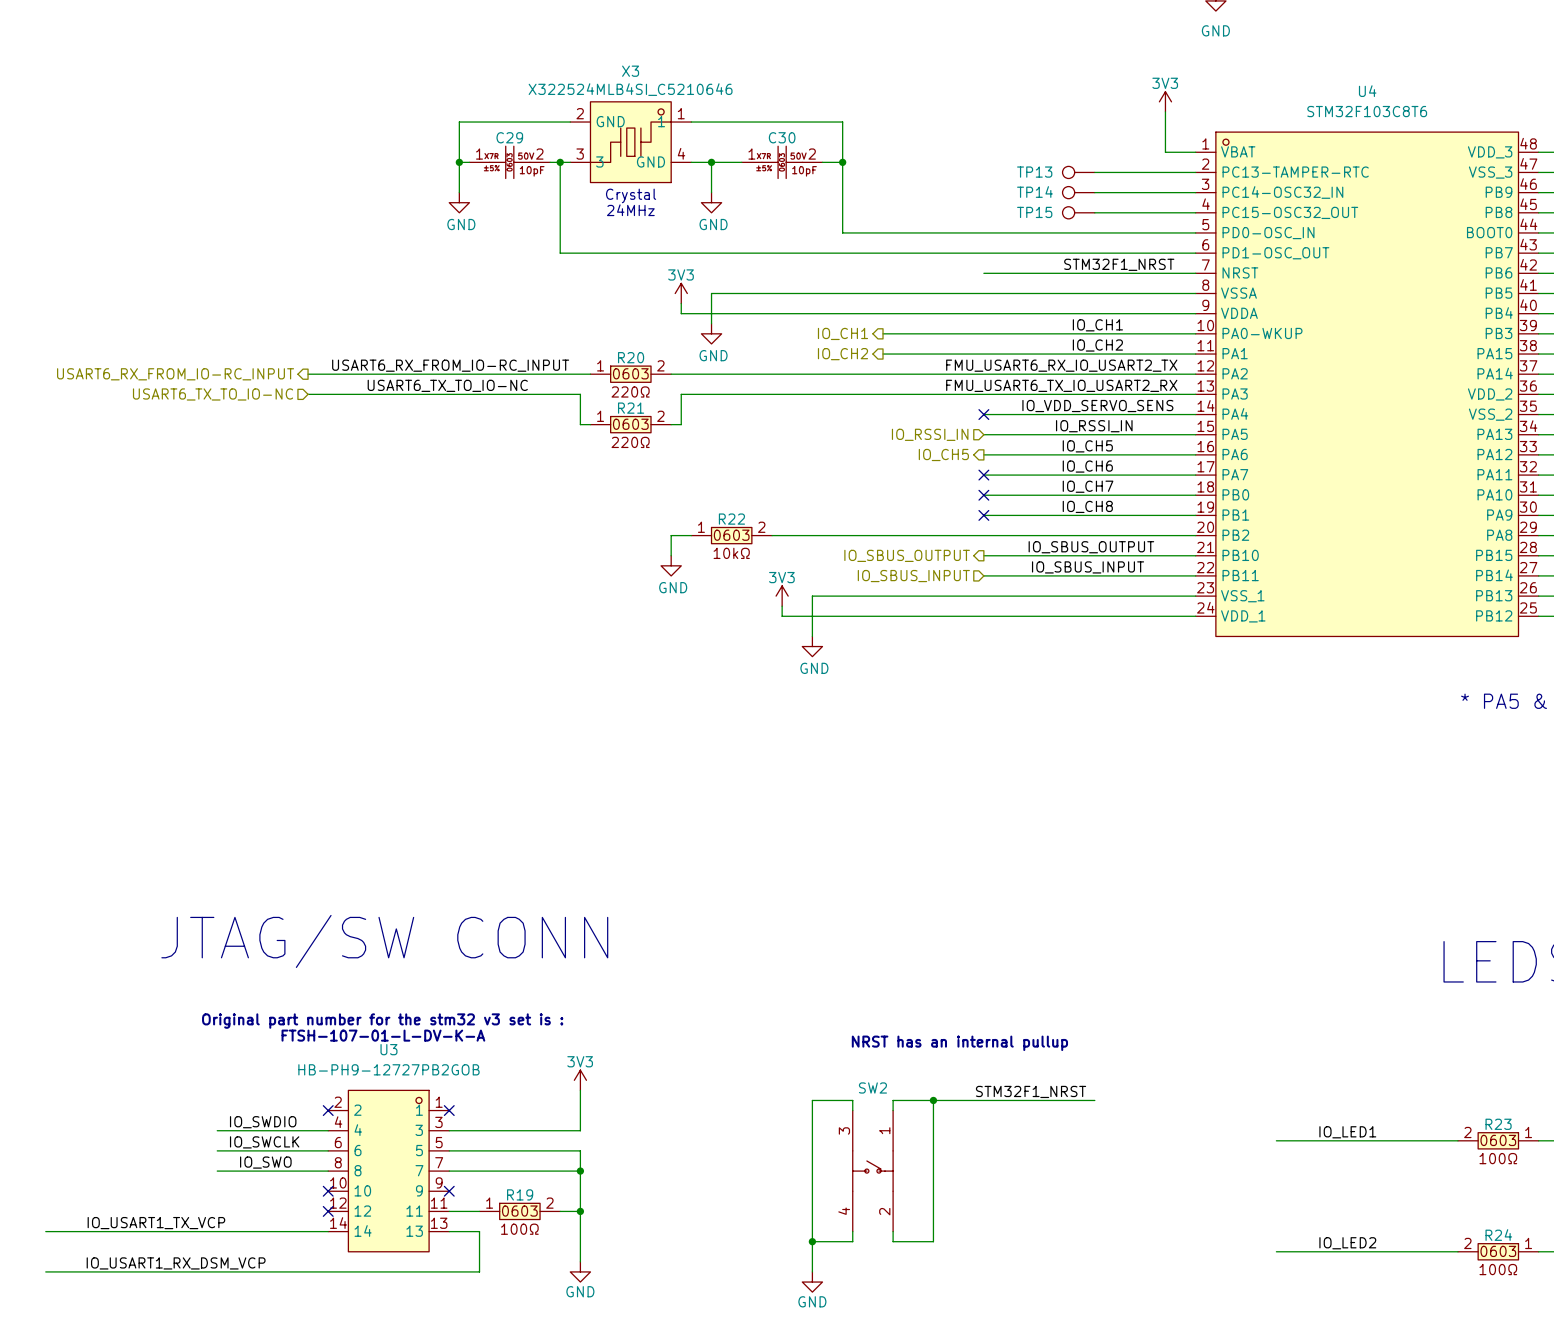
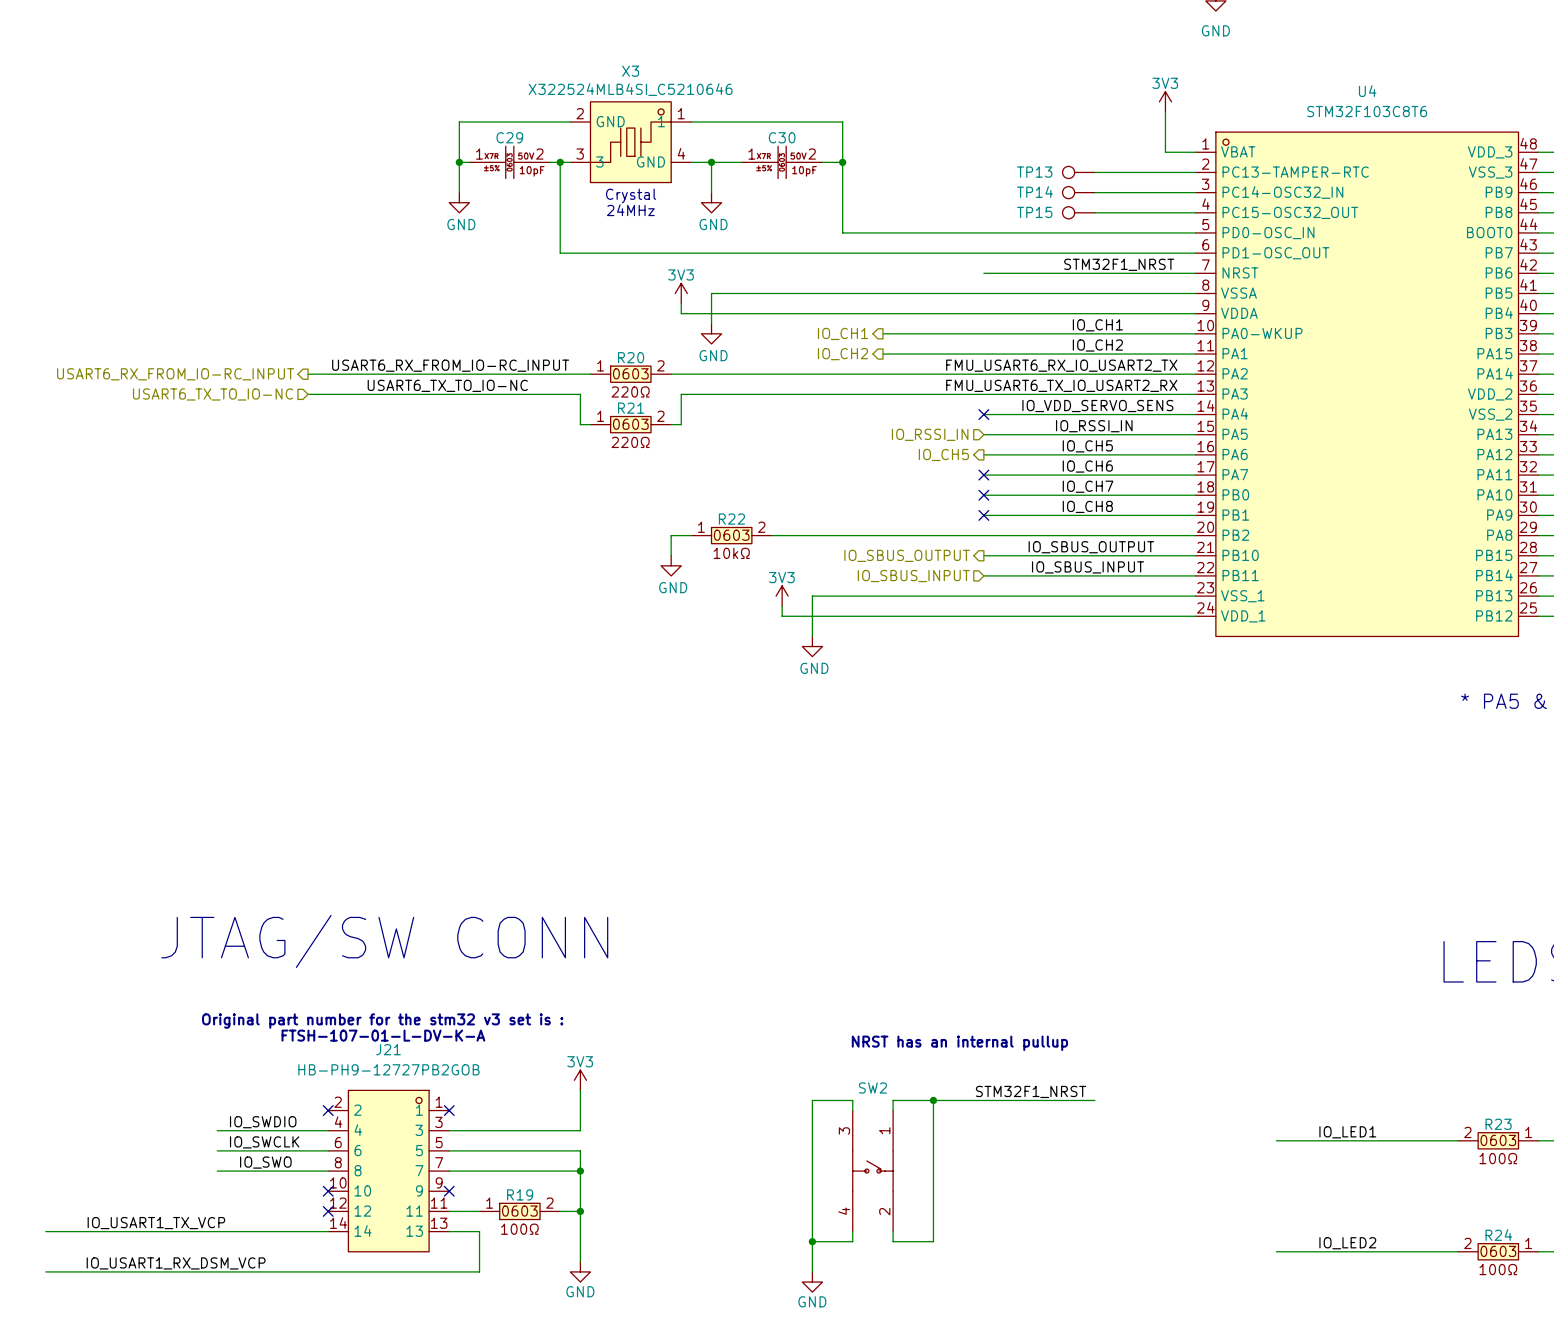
U3 name: U3 (388, 1049) -> J21 (388, 1049)

